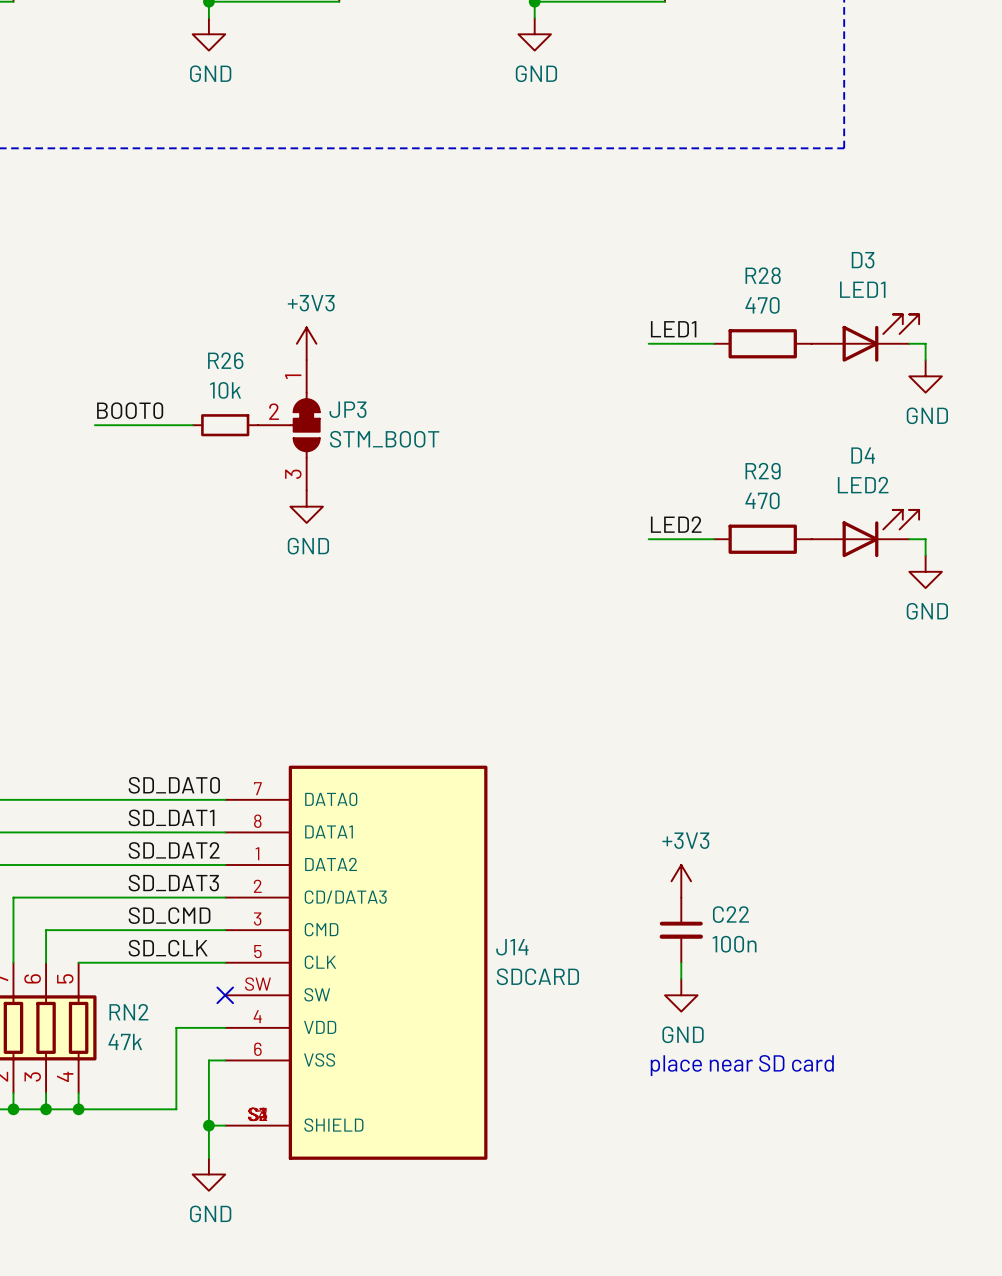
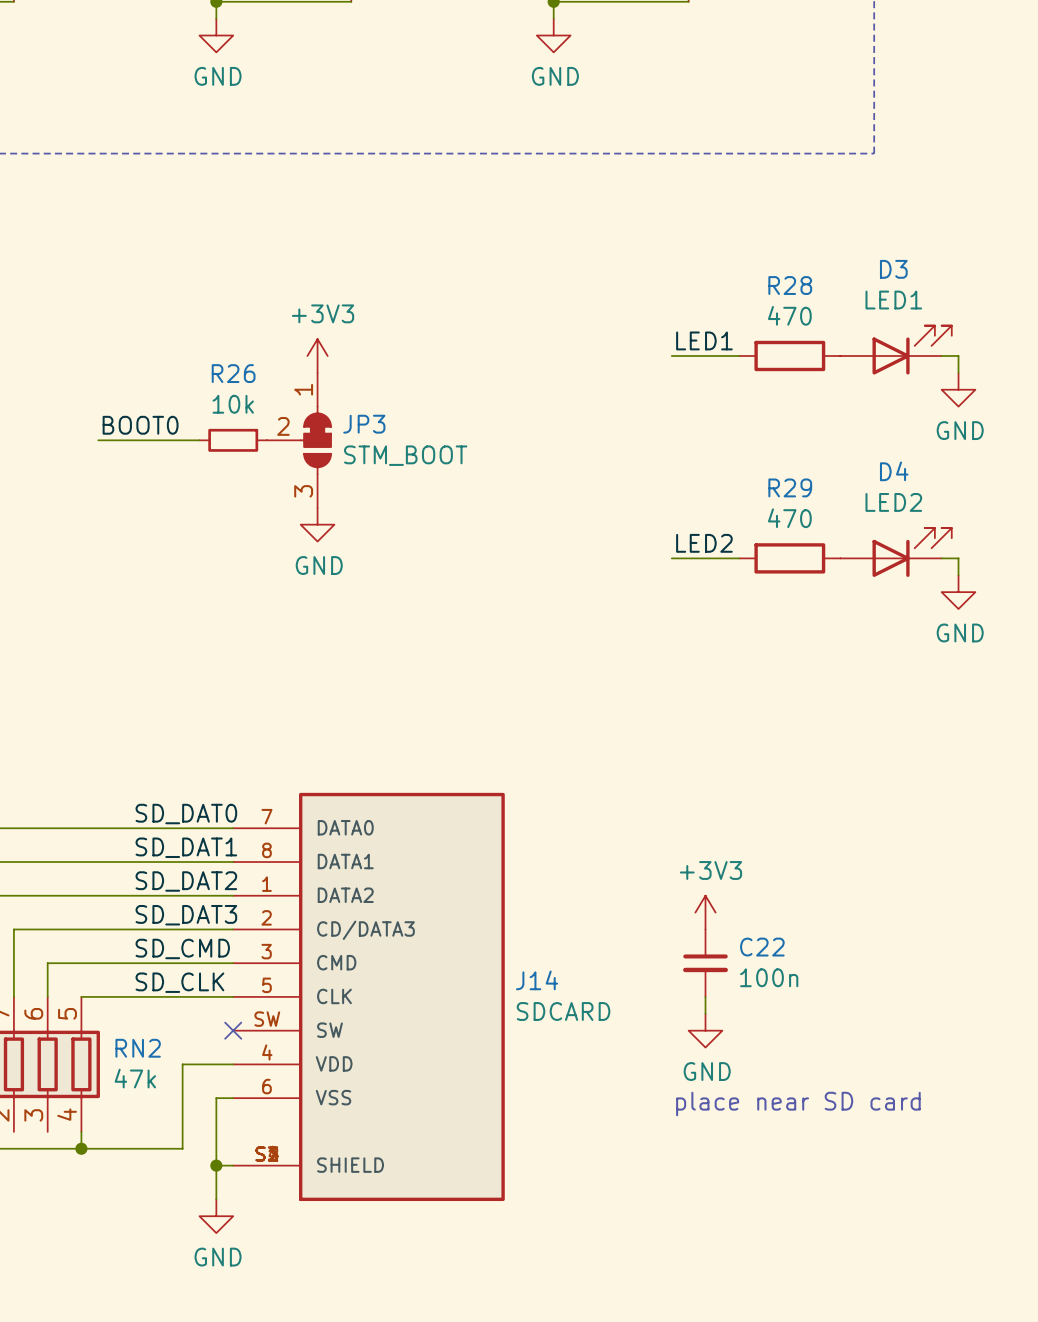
wire: (13, 1093) (13, 1109) -> none
wire: (46, 1093) (46, 1109) -> none
junction: (13, 1109) -> none
junction: (46, 1109) -> none

